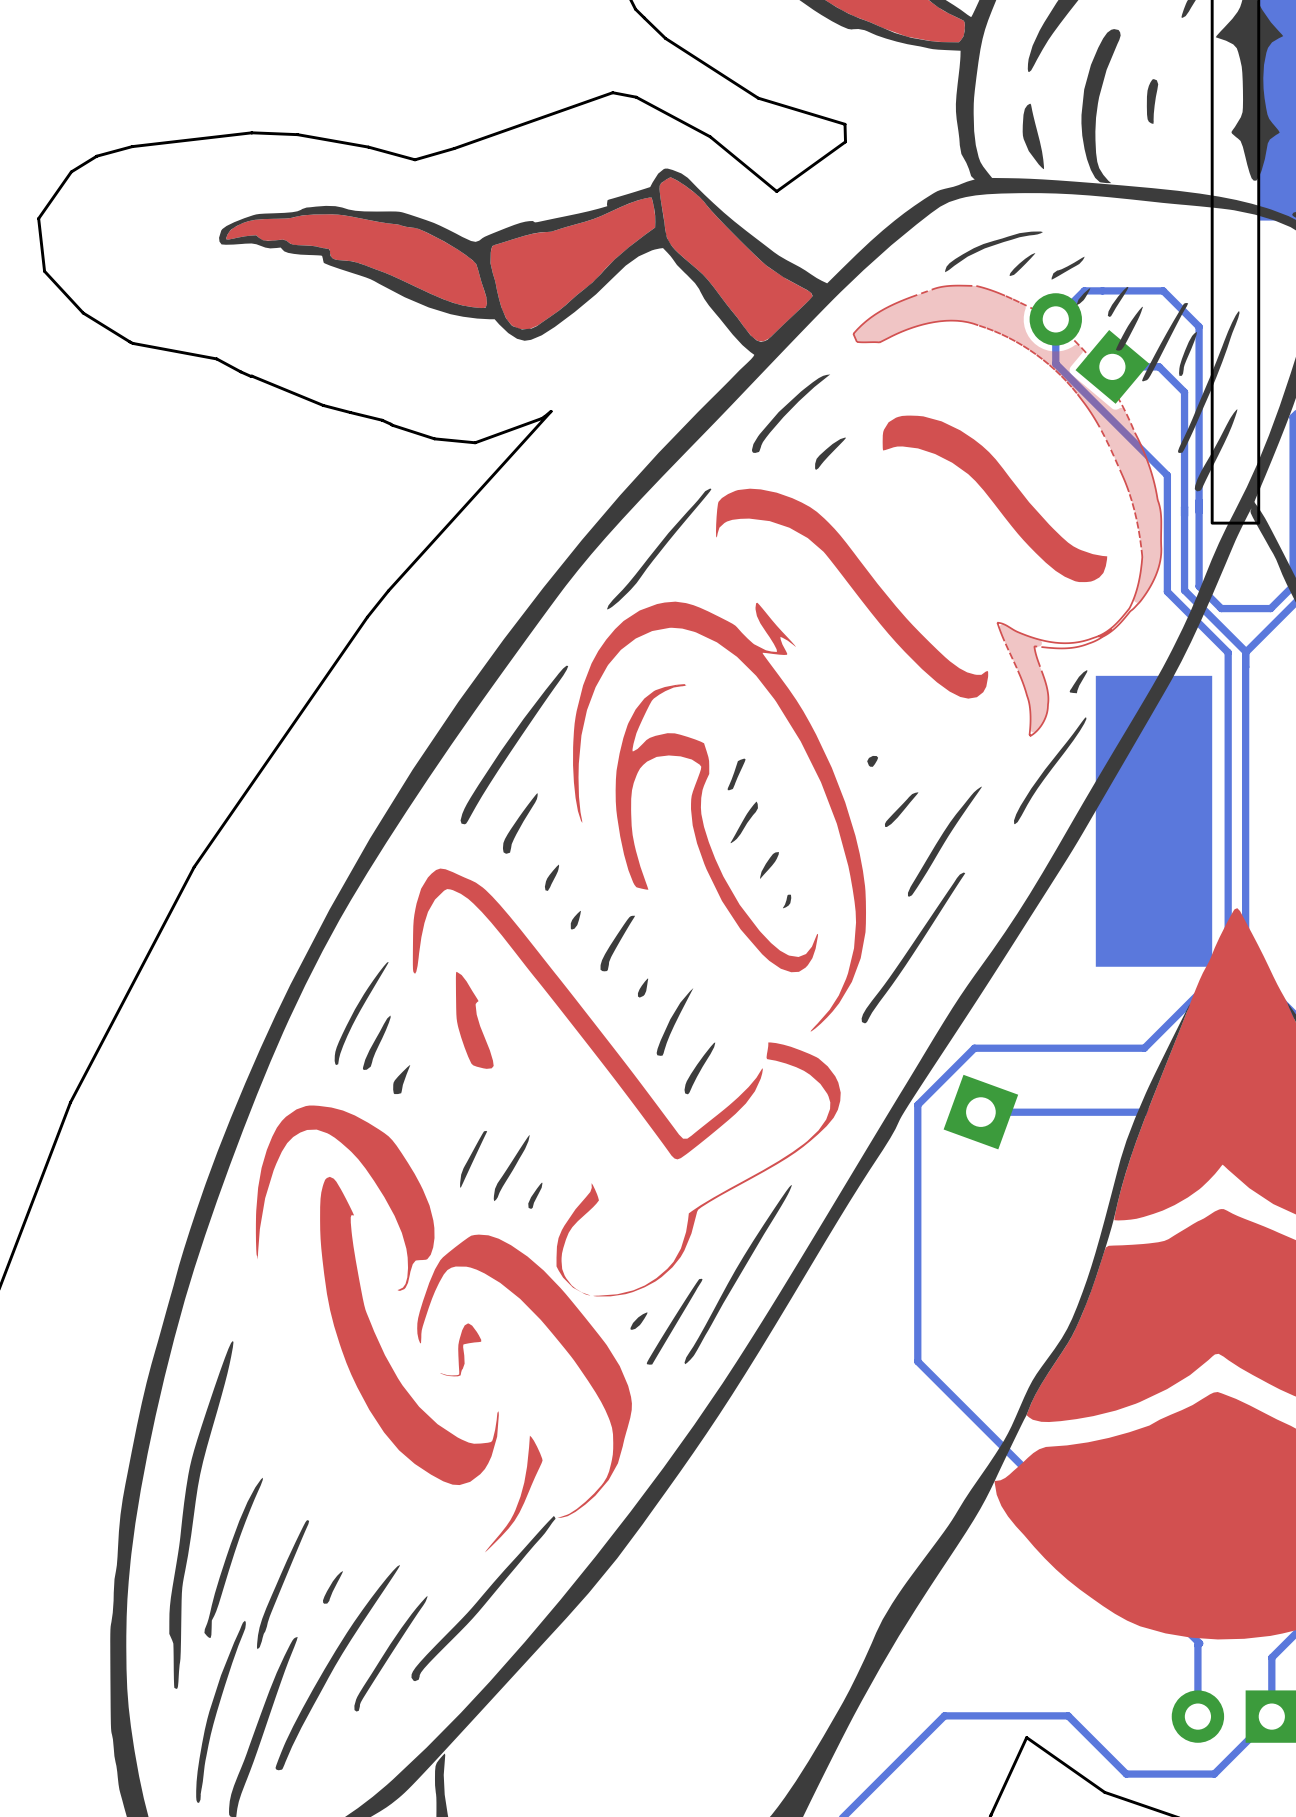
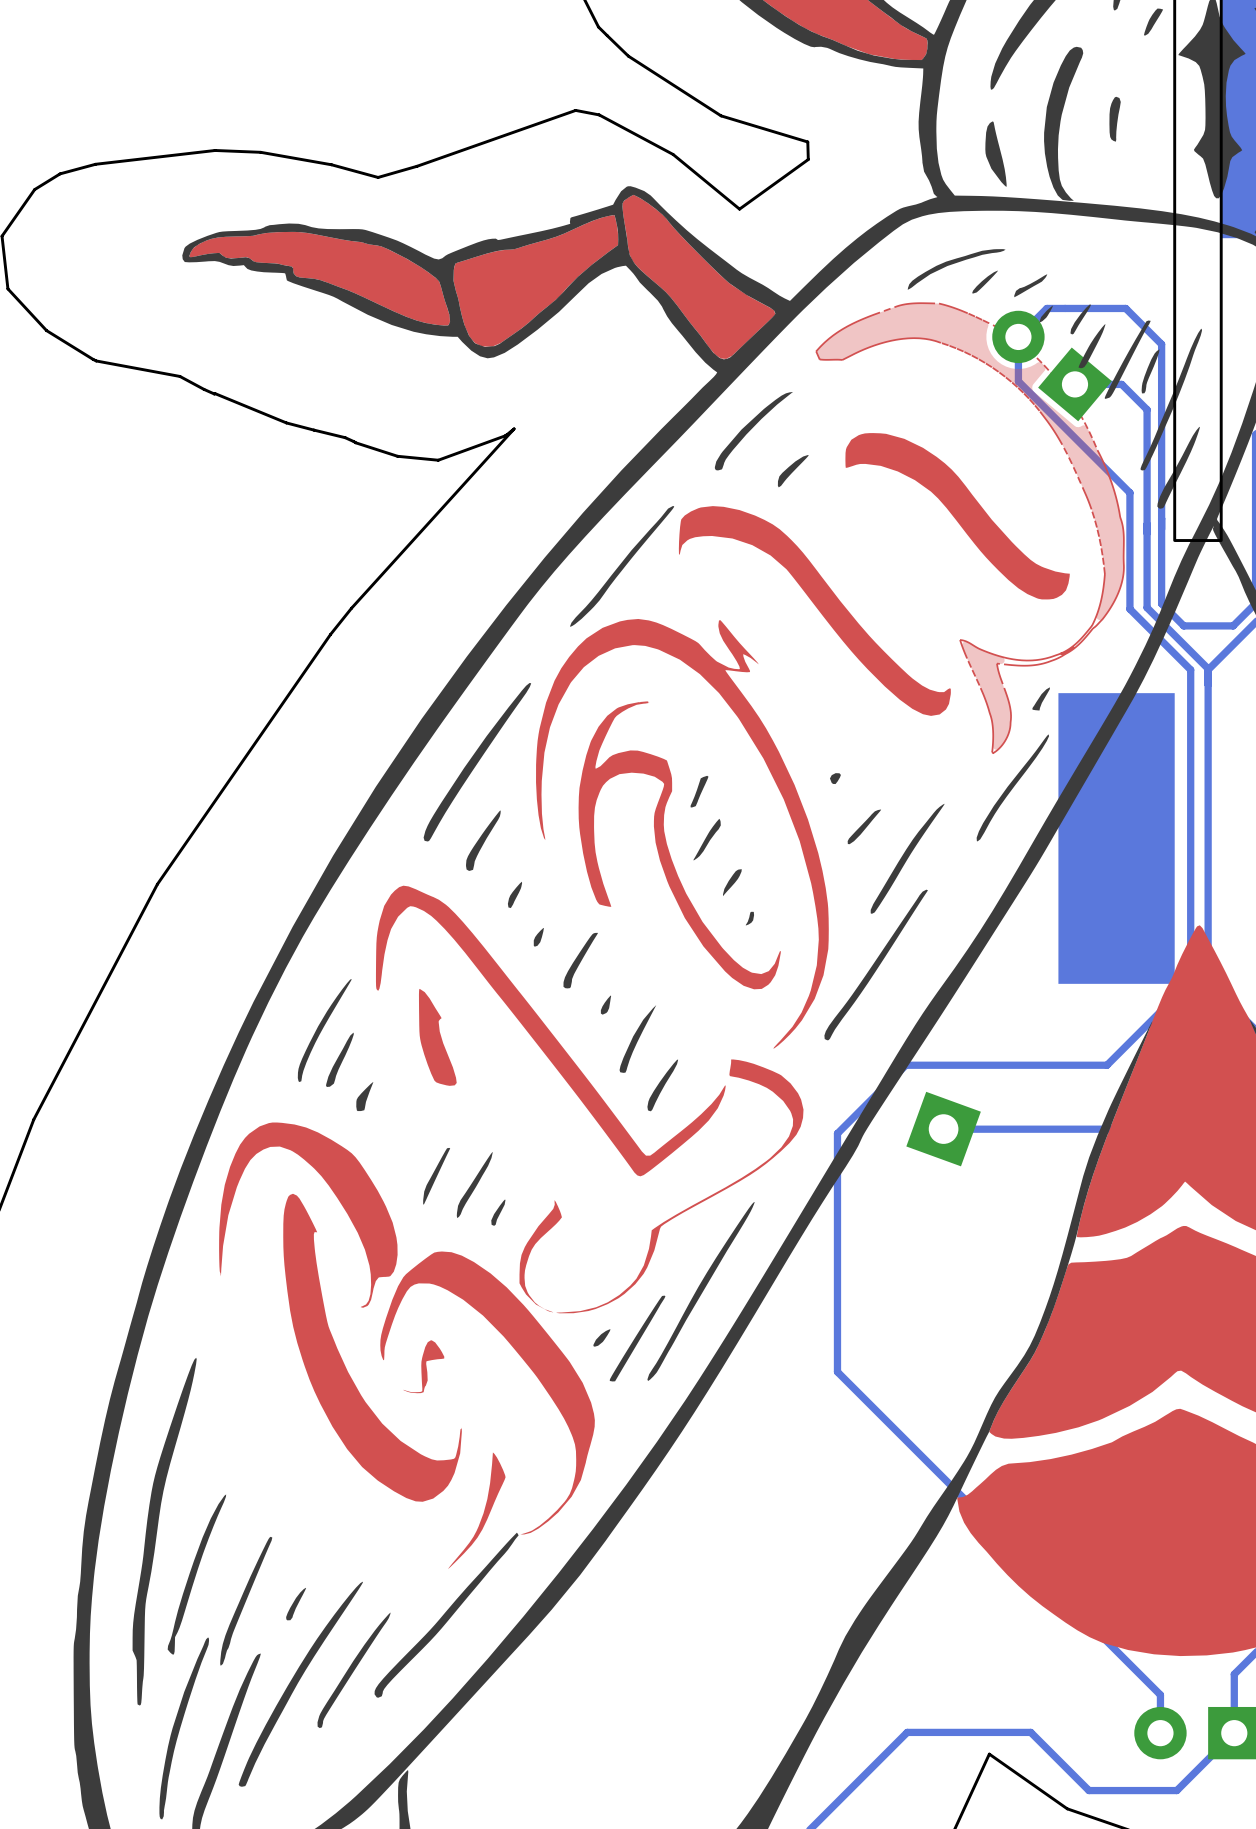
bottom track: (974, 1048) (917, 1104) (917, 1361) (1199, 1643) (1197, 1645) (1197, 1678) -> (937, 1065) (905, 1065) (837, 1133) (837, 1371) (1160, 1694)

